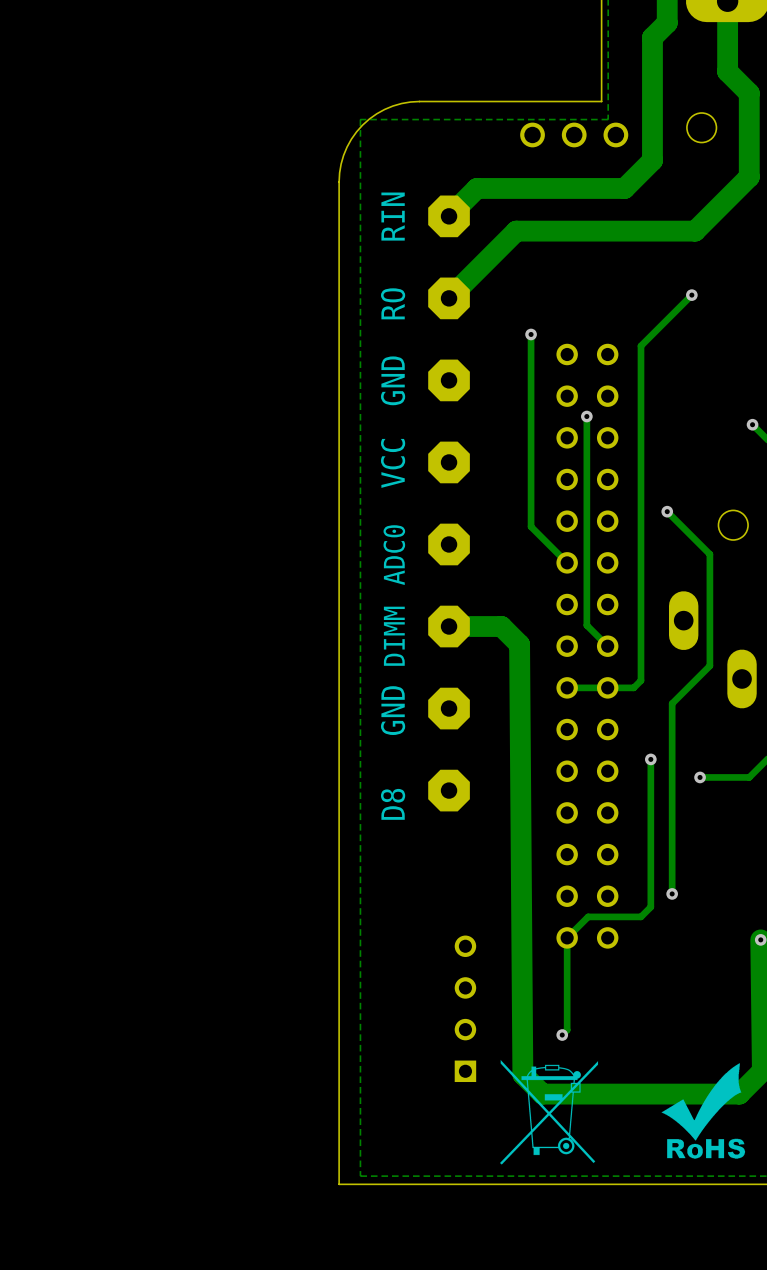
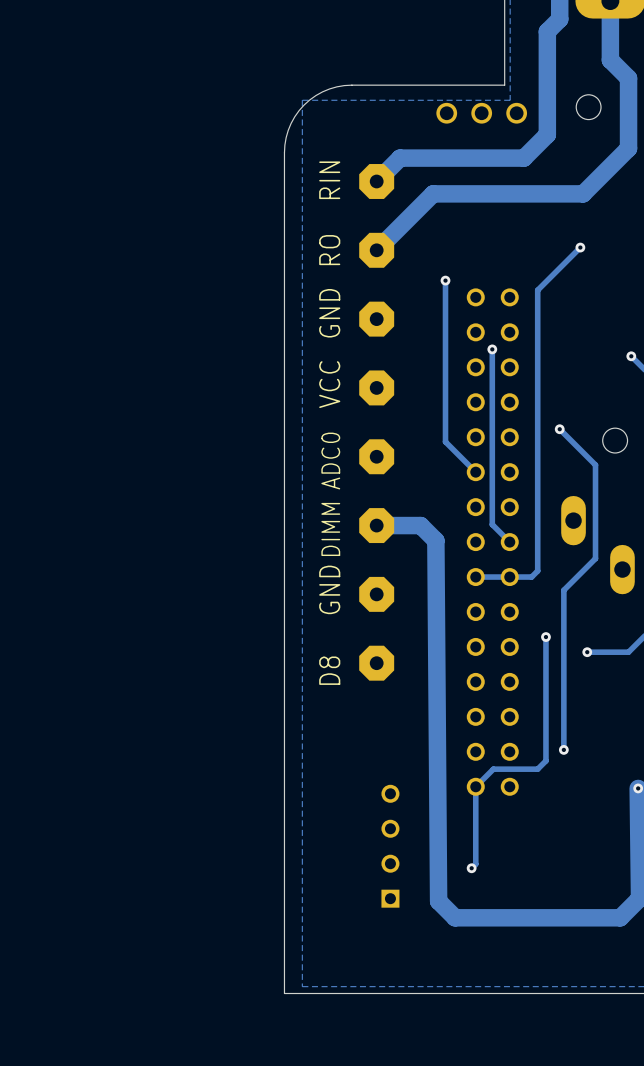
drawing: [499, 1059, 599, 1165] -> none
drawing: [661, 1063, 746, 1159] -> none

